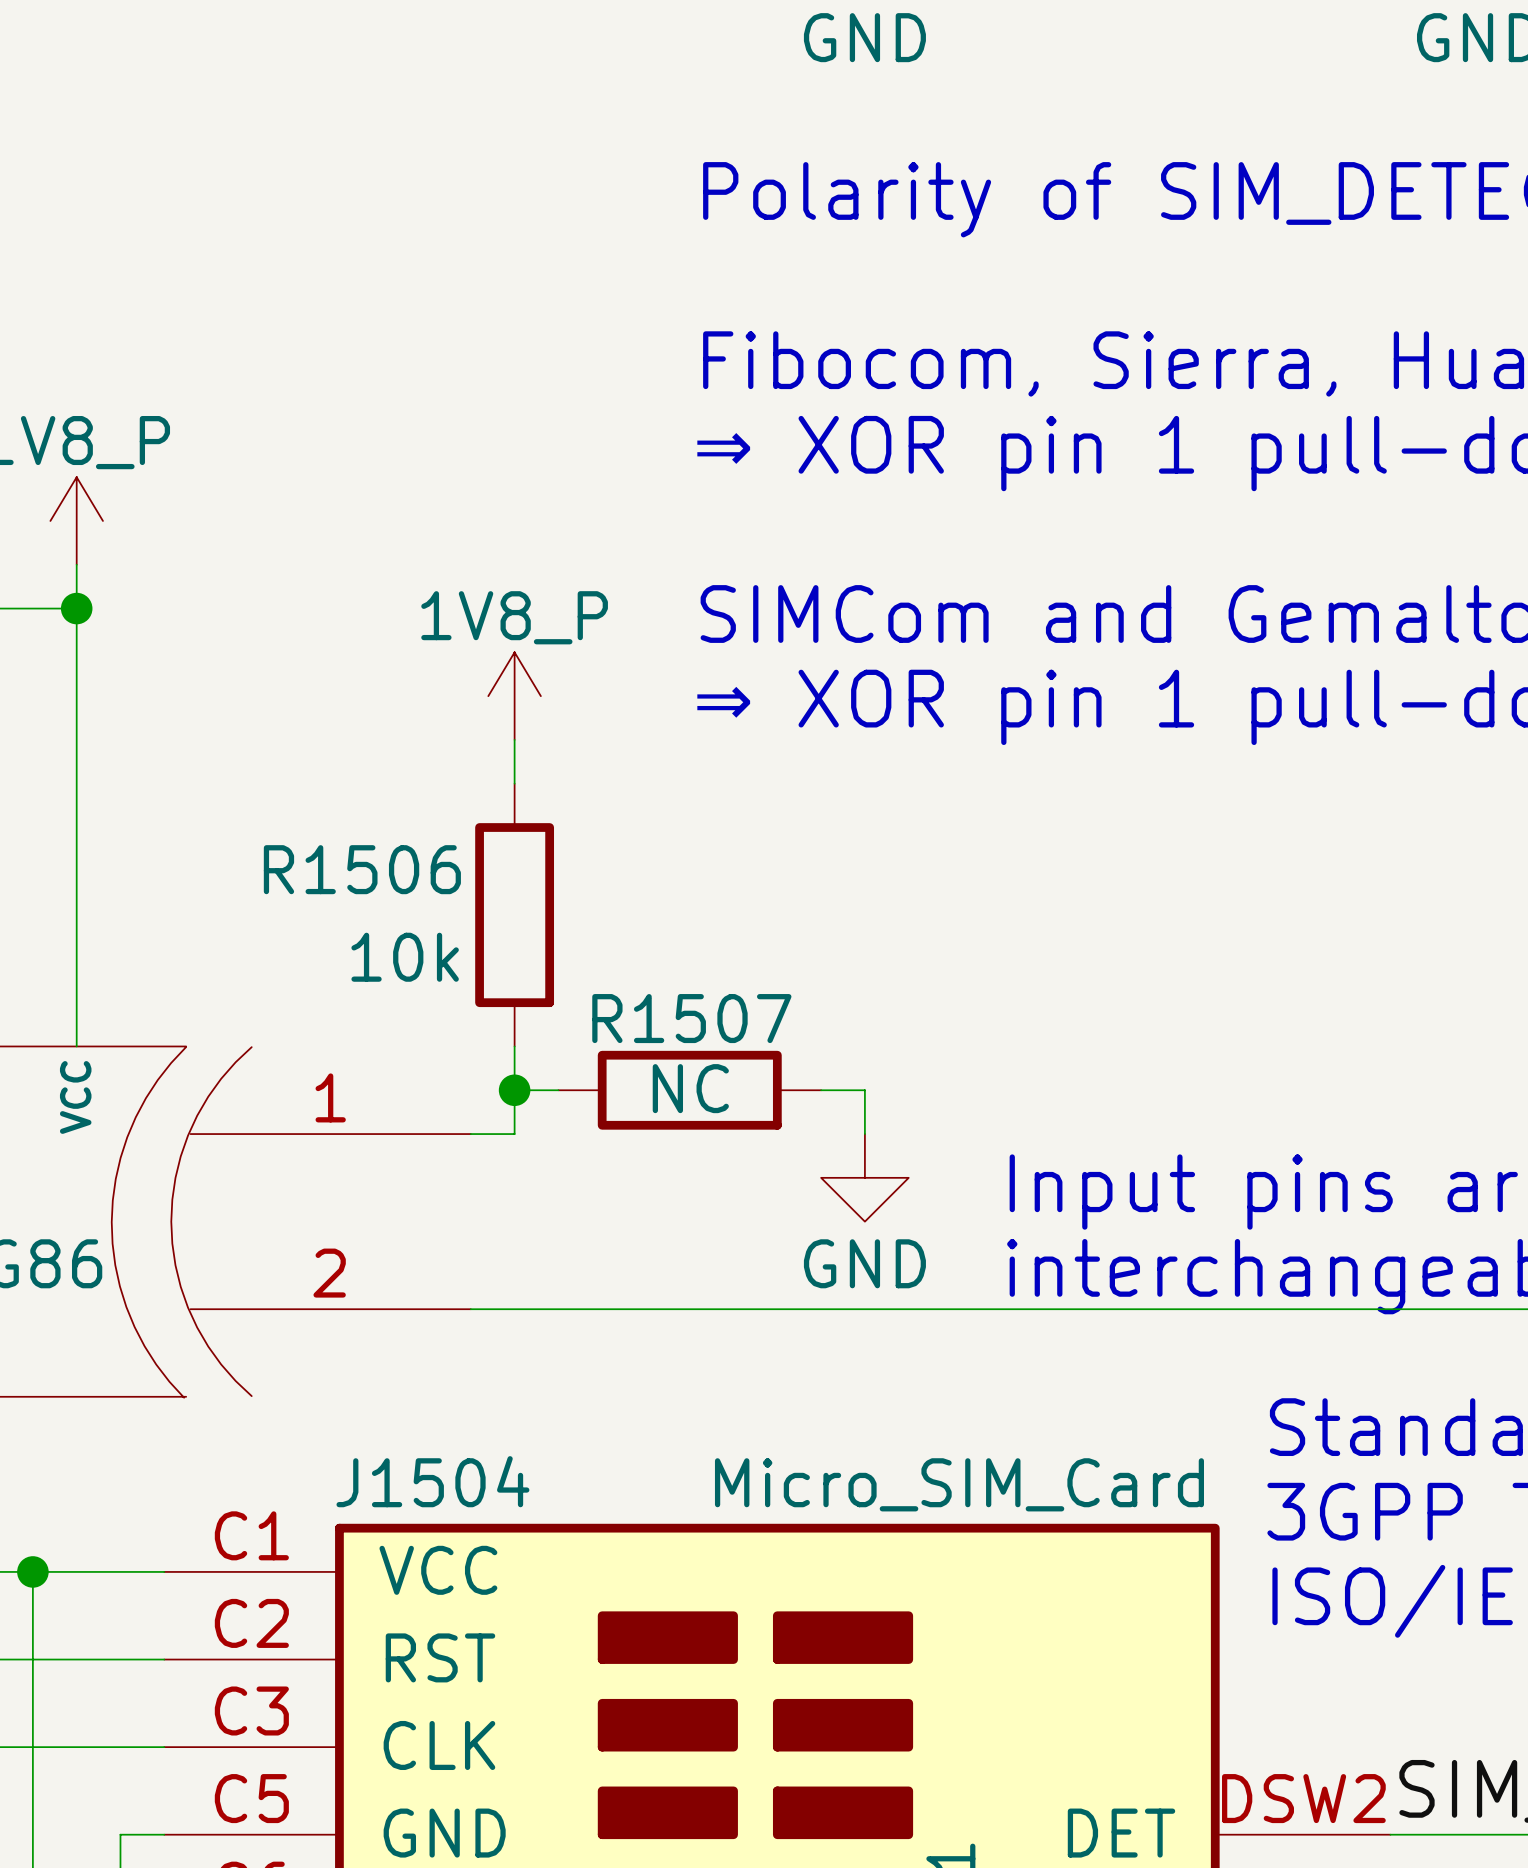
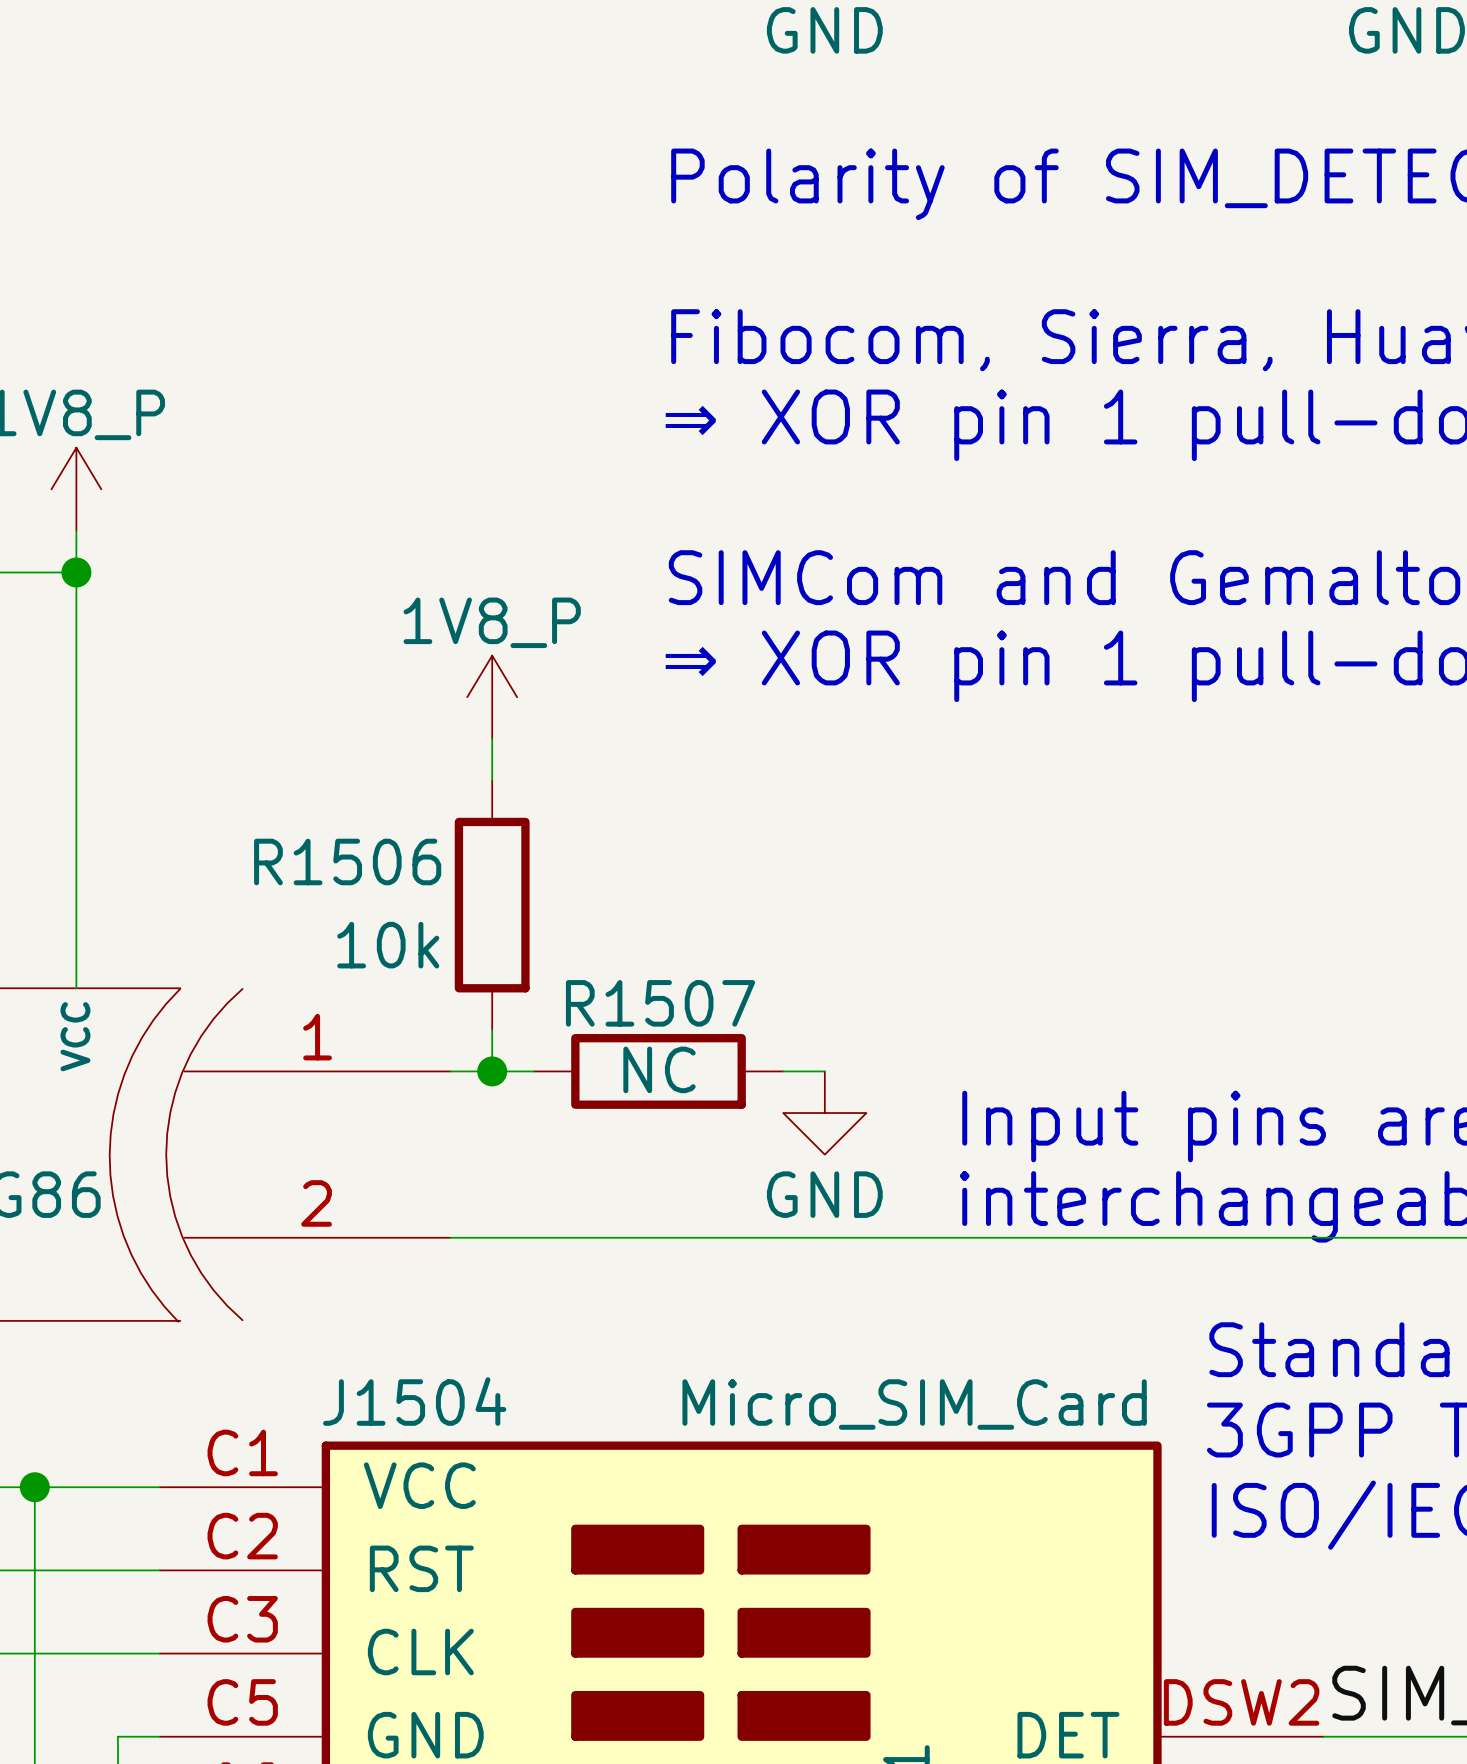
power symbol position: 1V8_P (514, 696) -> 1V8_P (492, 697)
R1506 position: (514, 915) -> (492, 905)
wire: (514, 1046) (514, 1090) (558, 1090) -> none
junction position: (514, 1090) -> (492, 1071)
R1507 position: (689, 1090) -> (658, 1071)
wire: (821, 1090) (864, 1090) (864, 1134) -> (783, 1071) (824, 1071)
wire: none -> (492, 1071) (533, 1071)

